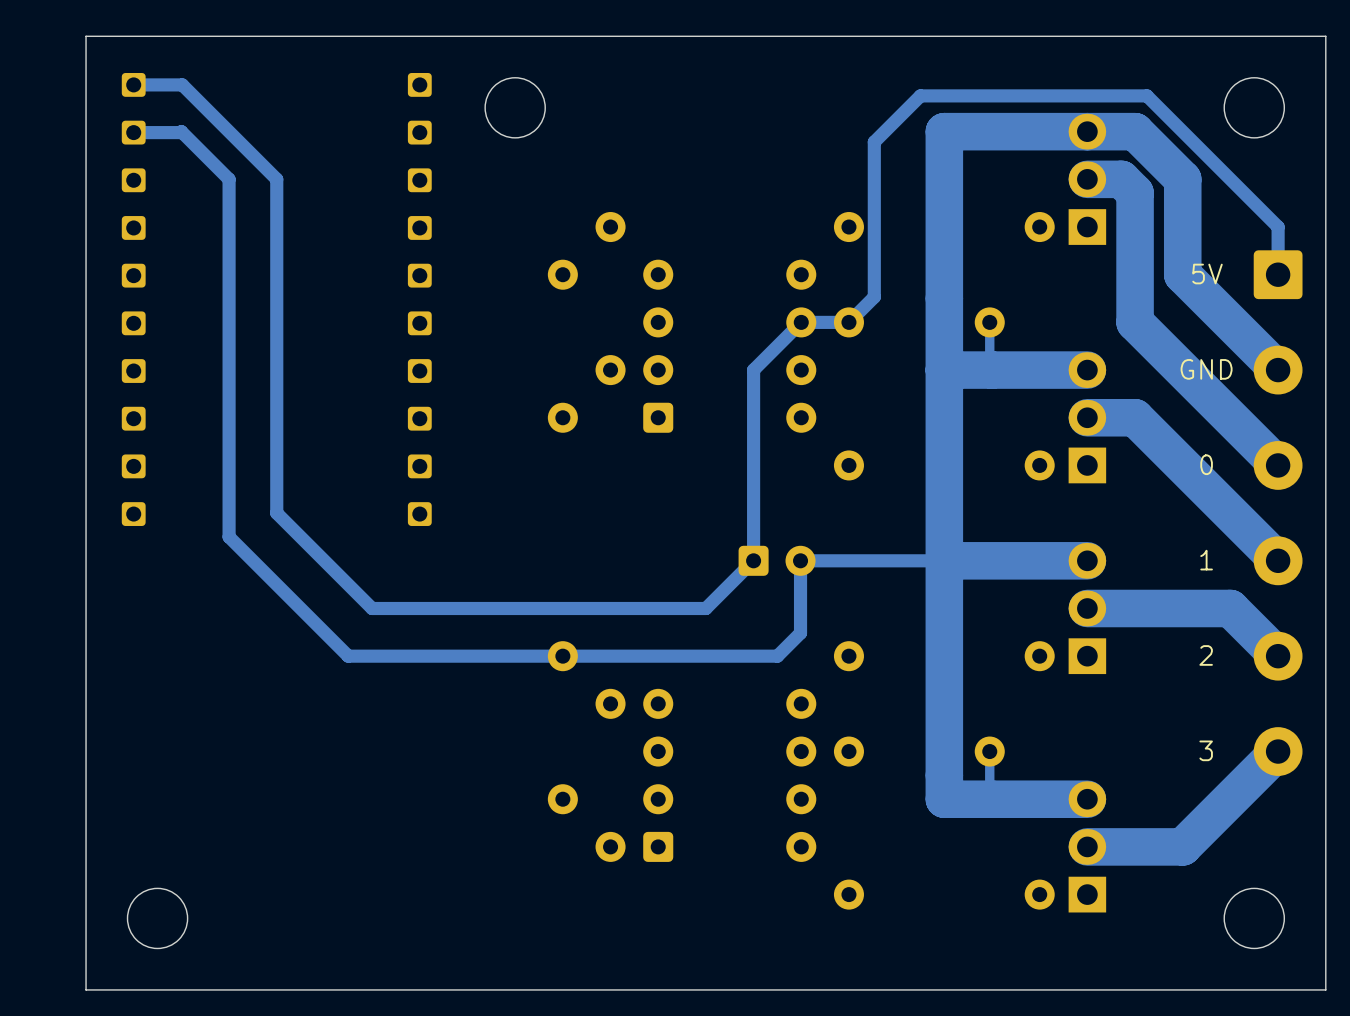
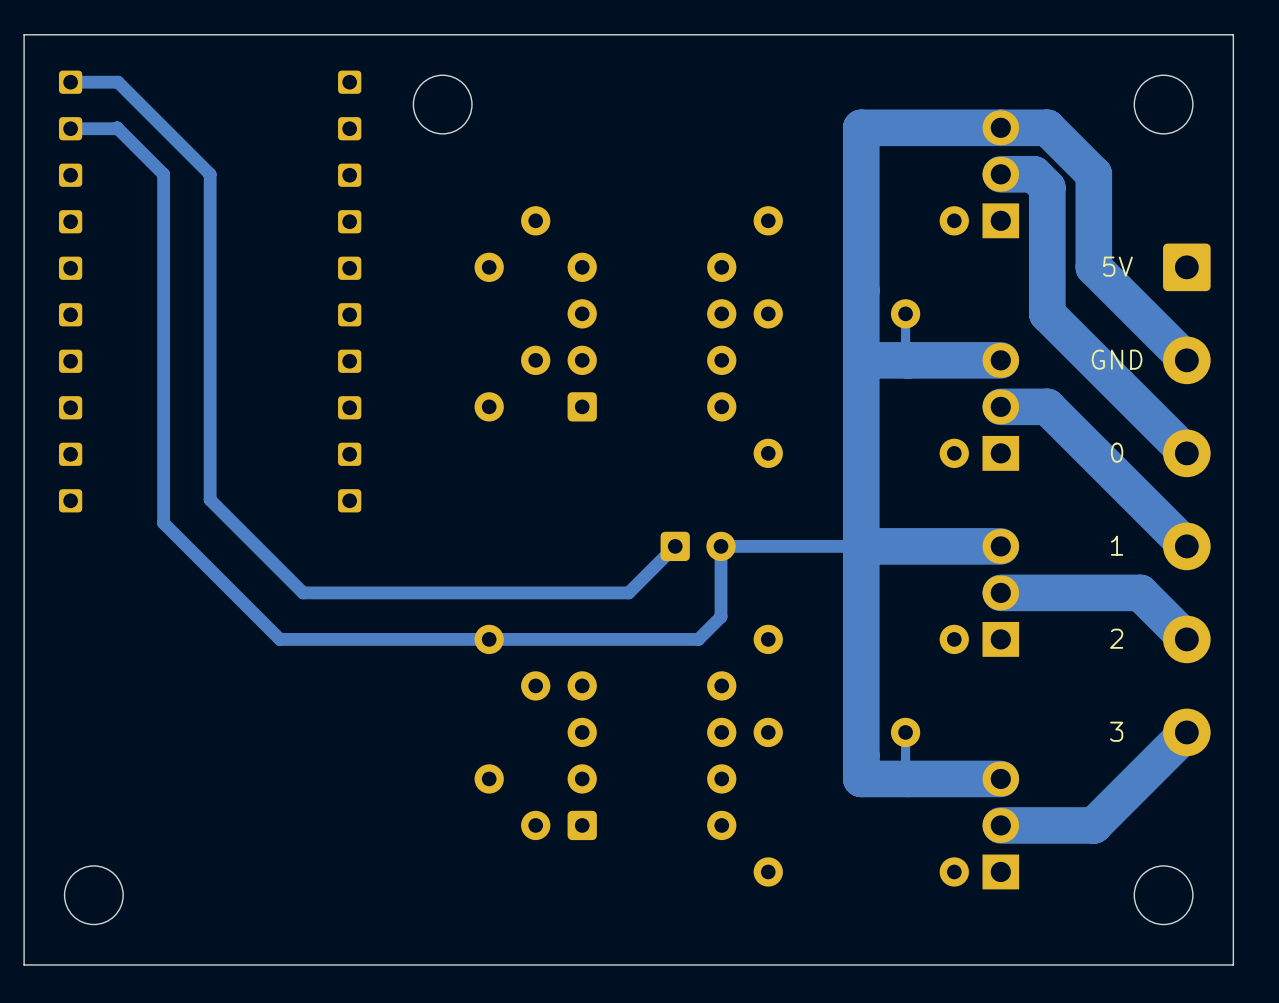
track: (1278, 274) (1278, 227) (1146, 95) (920, 95) (874, 142) (874, 297) (848, 322) (801, 322) (753, 370) (753, 560) -> none

